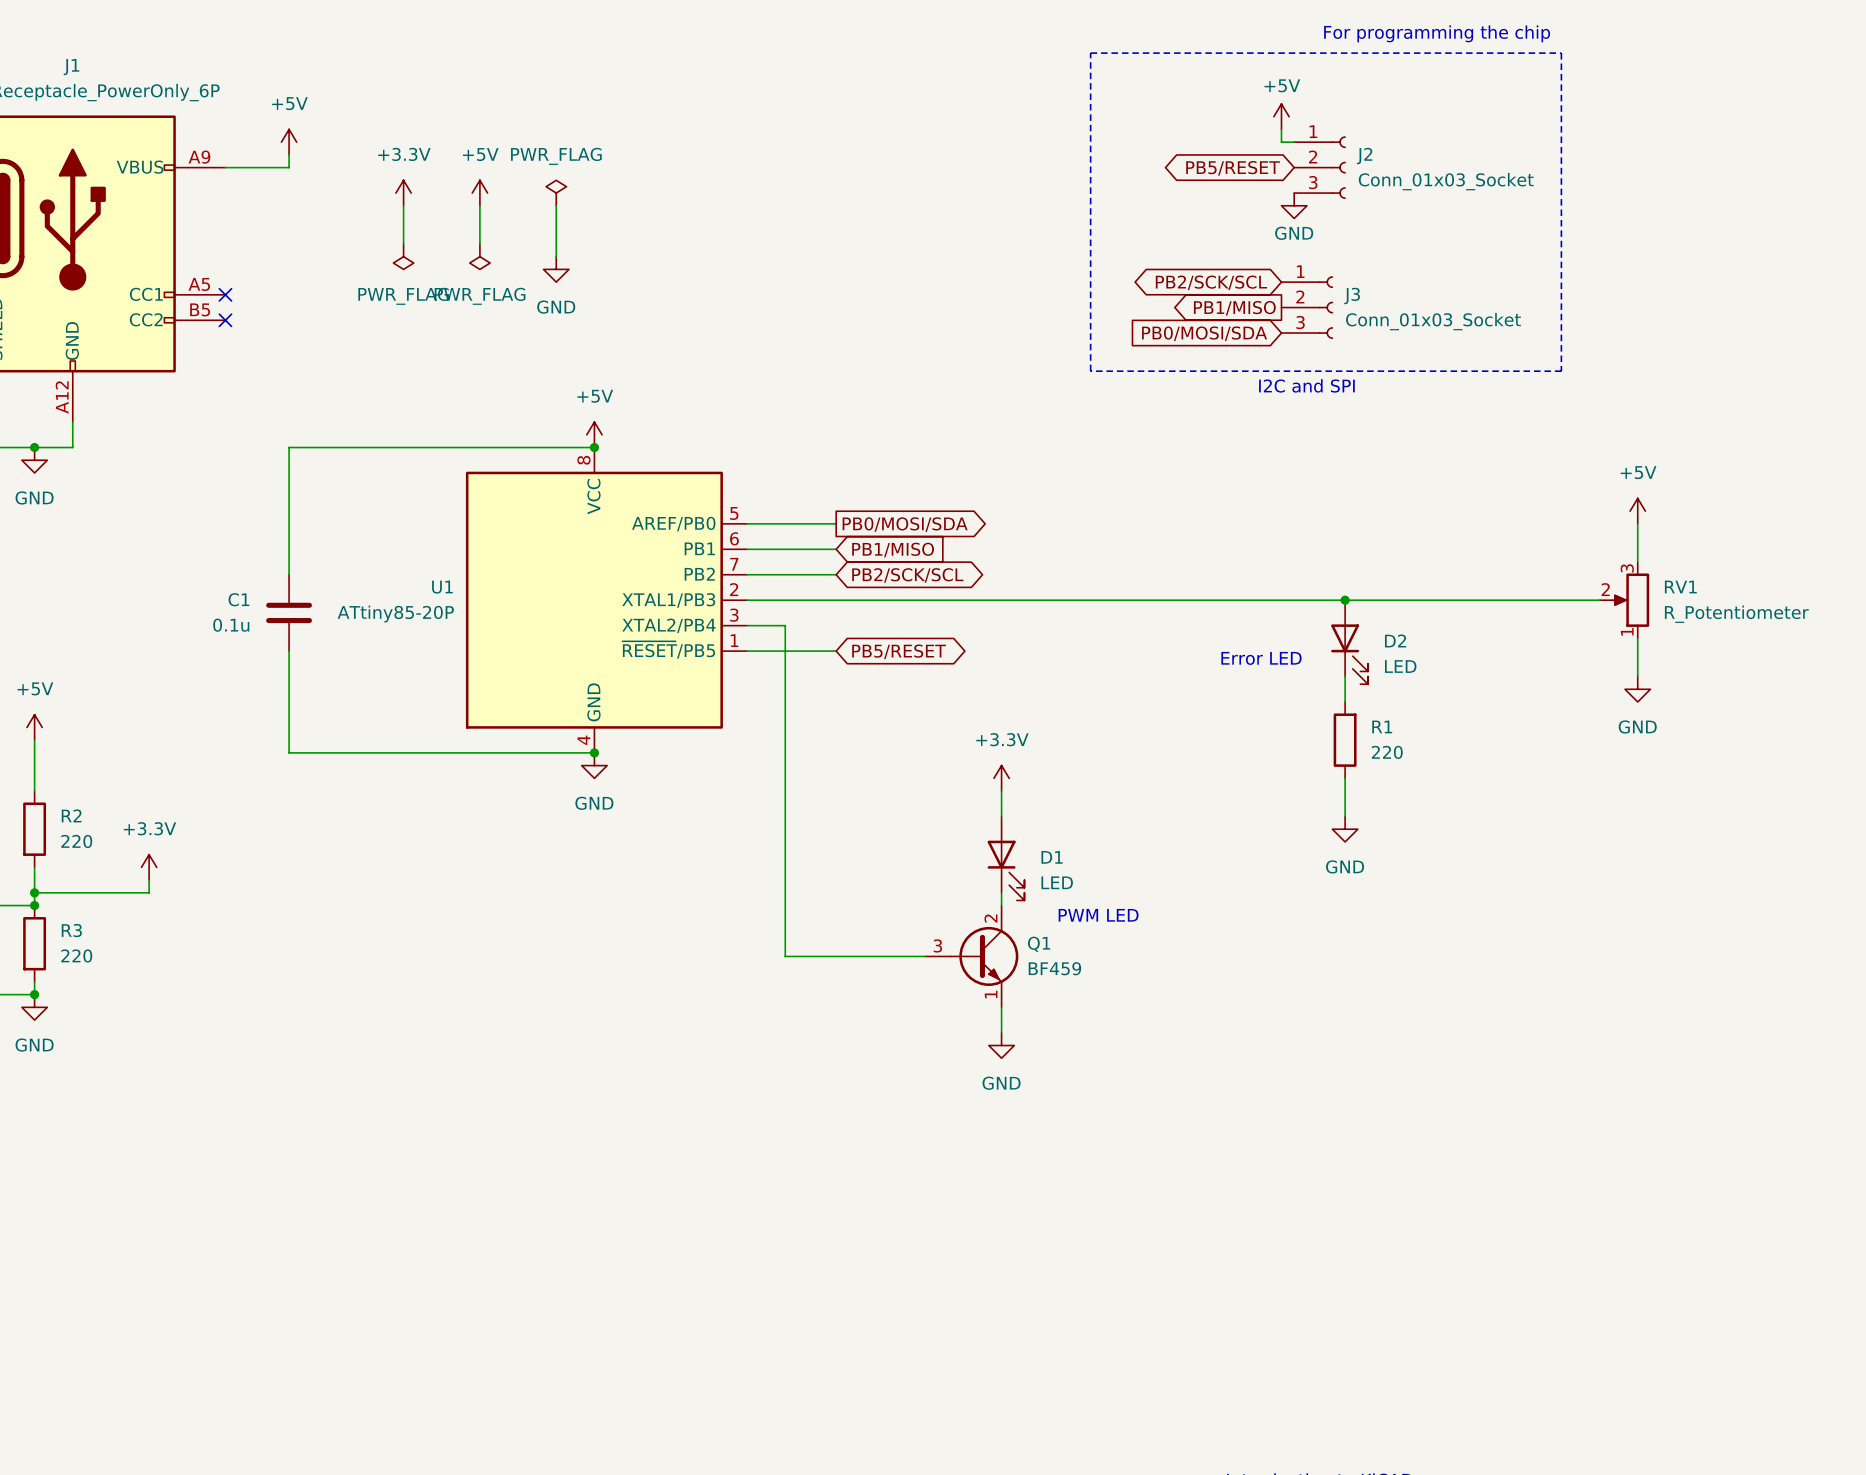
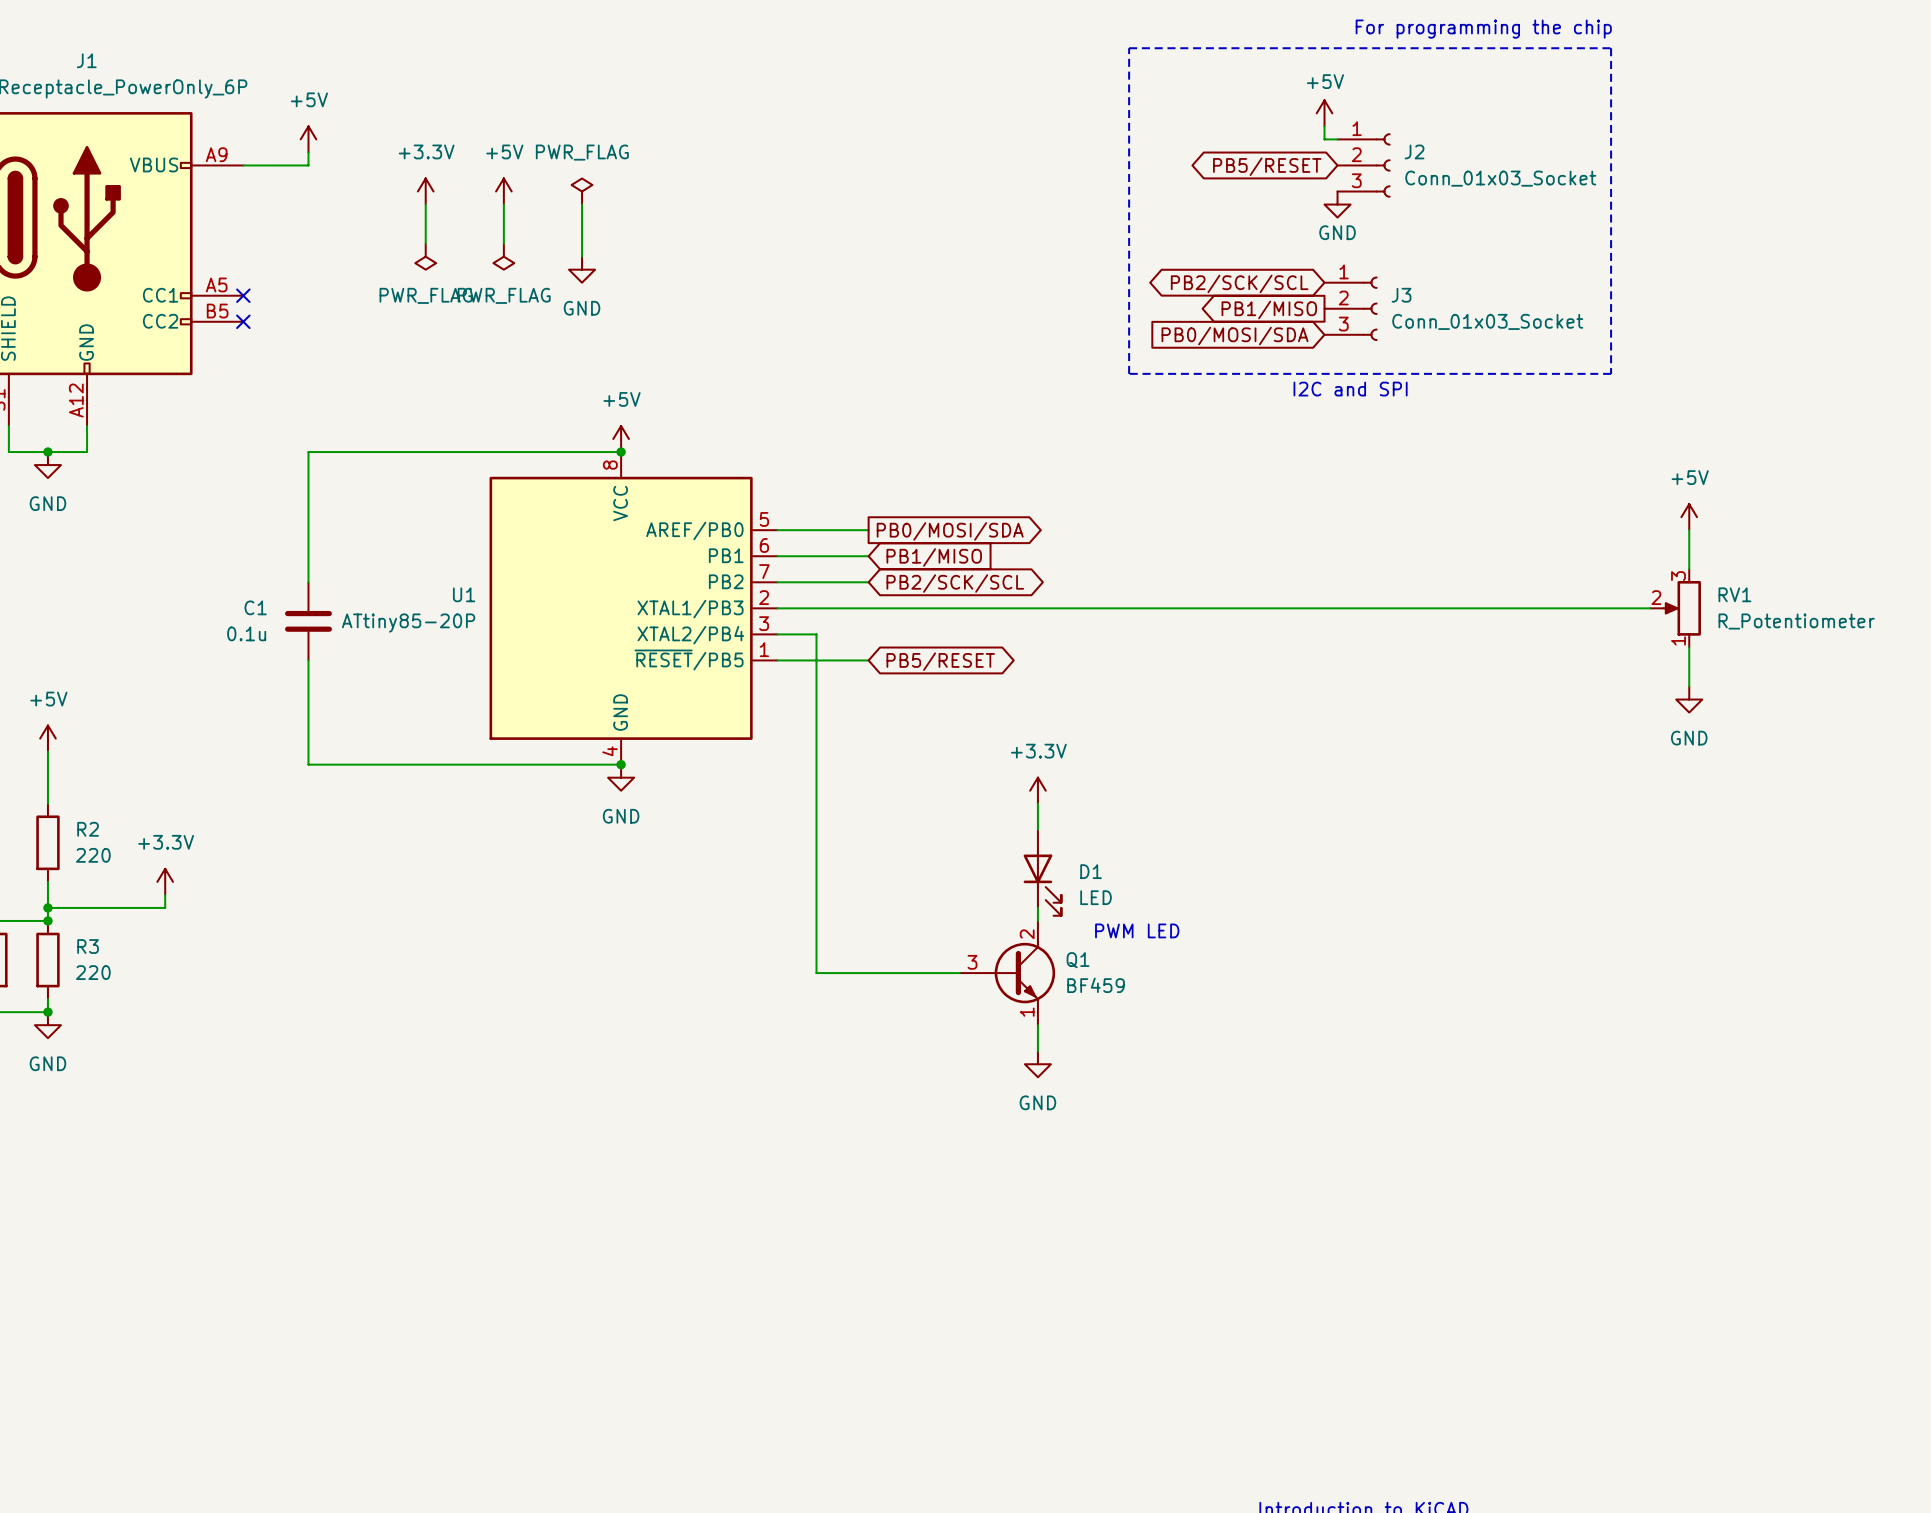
junction: (1345, 600) -> none
D2: LED (1349, 642) -> none
text: Error LED (1261, 658) -> none
wire: (1345, 676) (1345, 701) -> none
R1: 220 (1345, 740) -> none
wire: (1345, 778) (1345, 816) -> none
power symbol: GND (1345, 829) -> none

